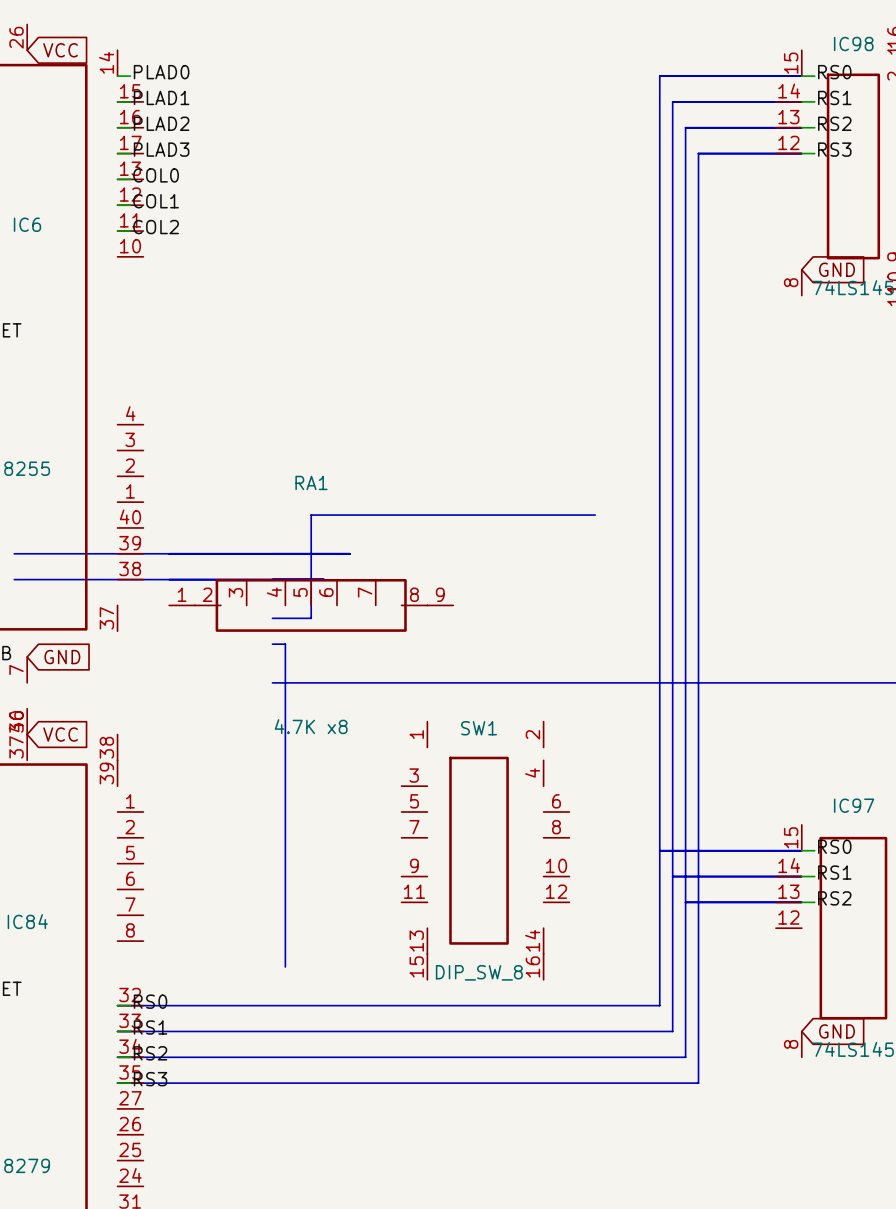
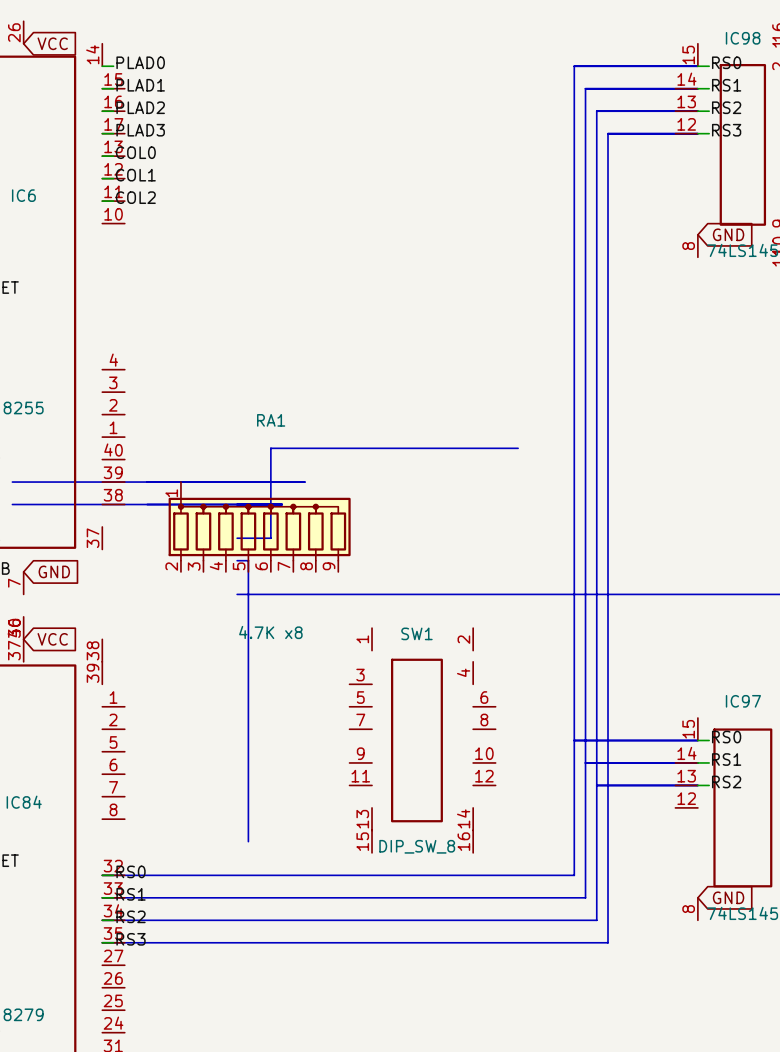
RA1 symbol: [169, 578, 454, 632] -> [168, 482, 351, 572]

